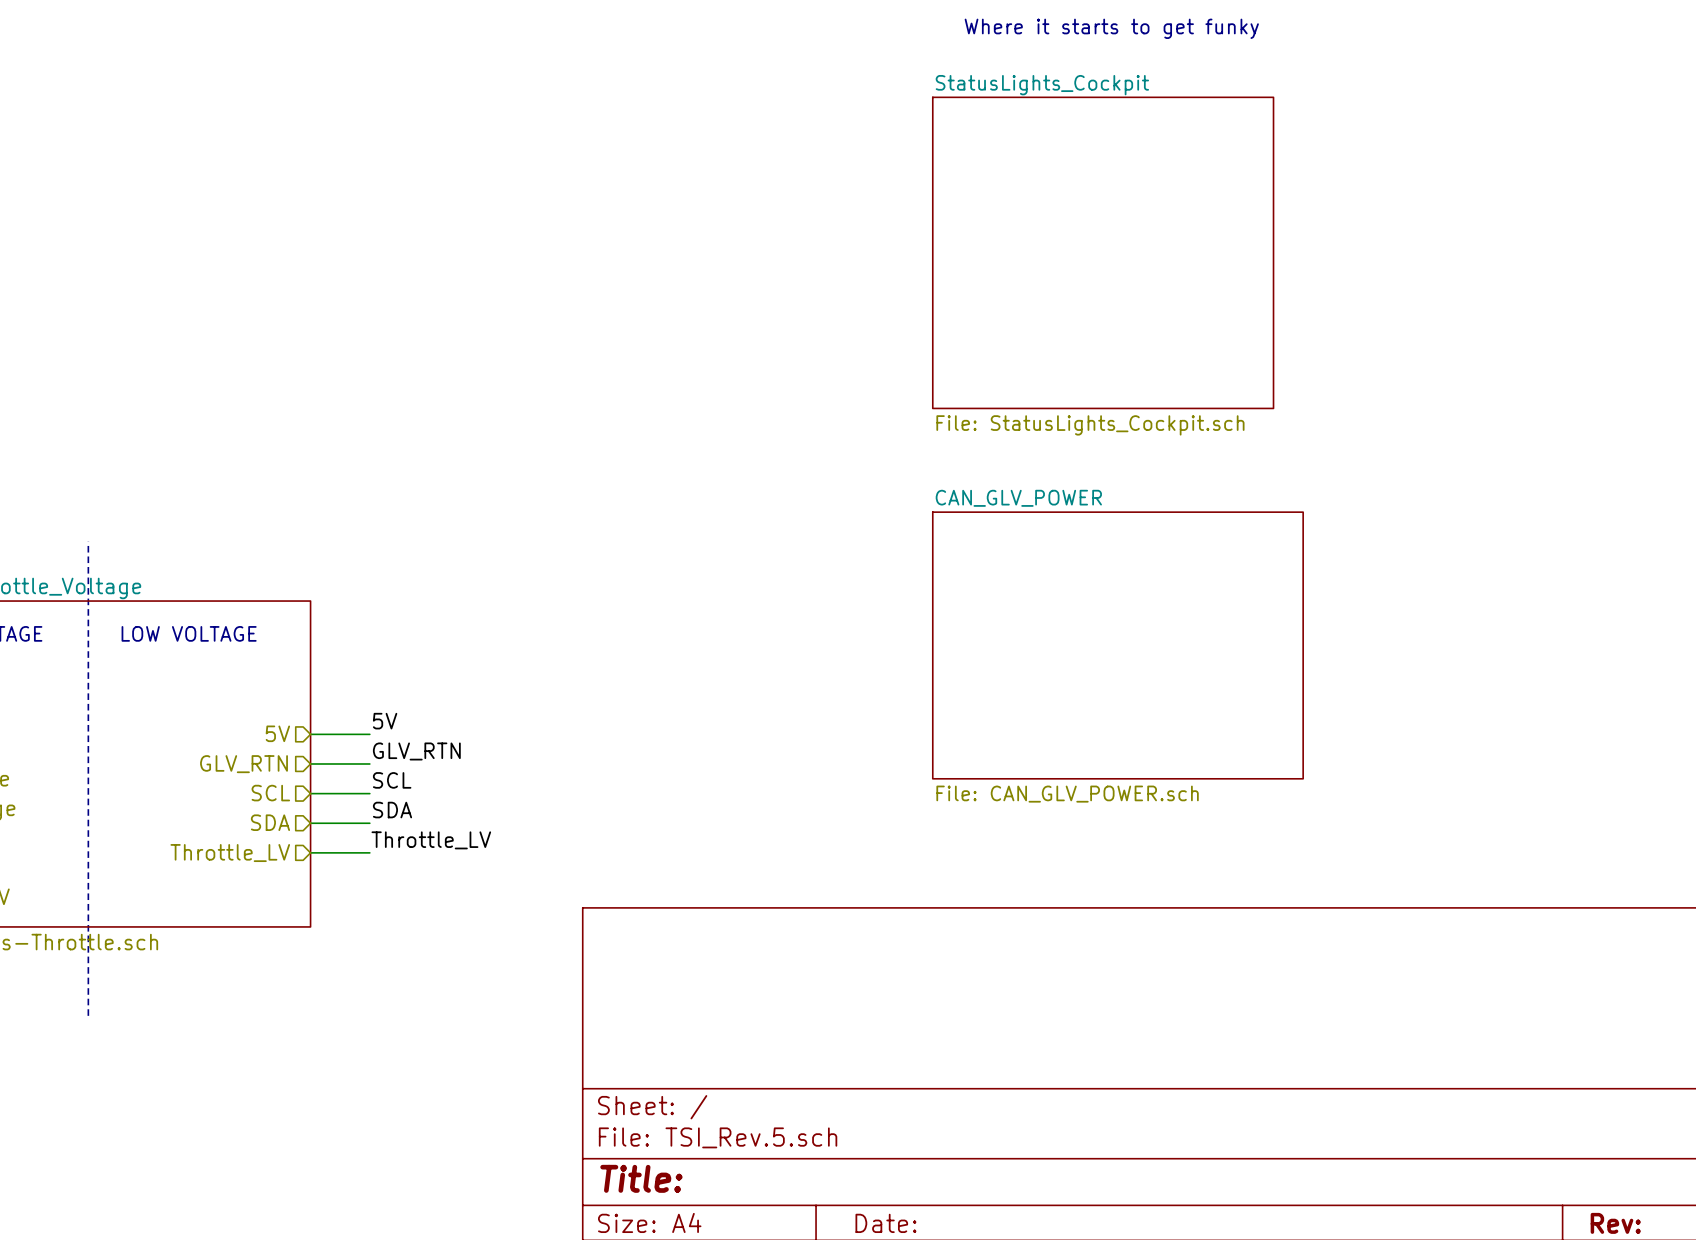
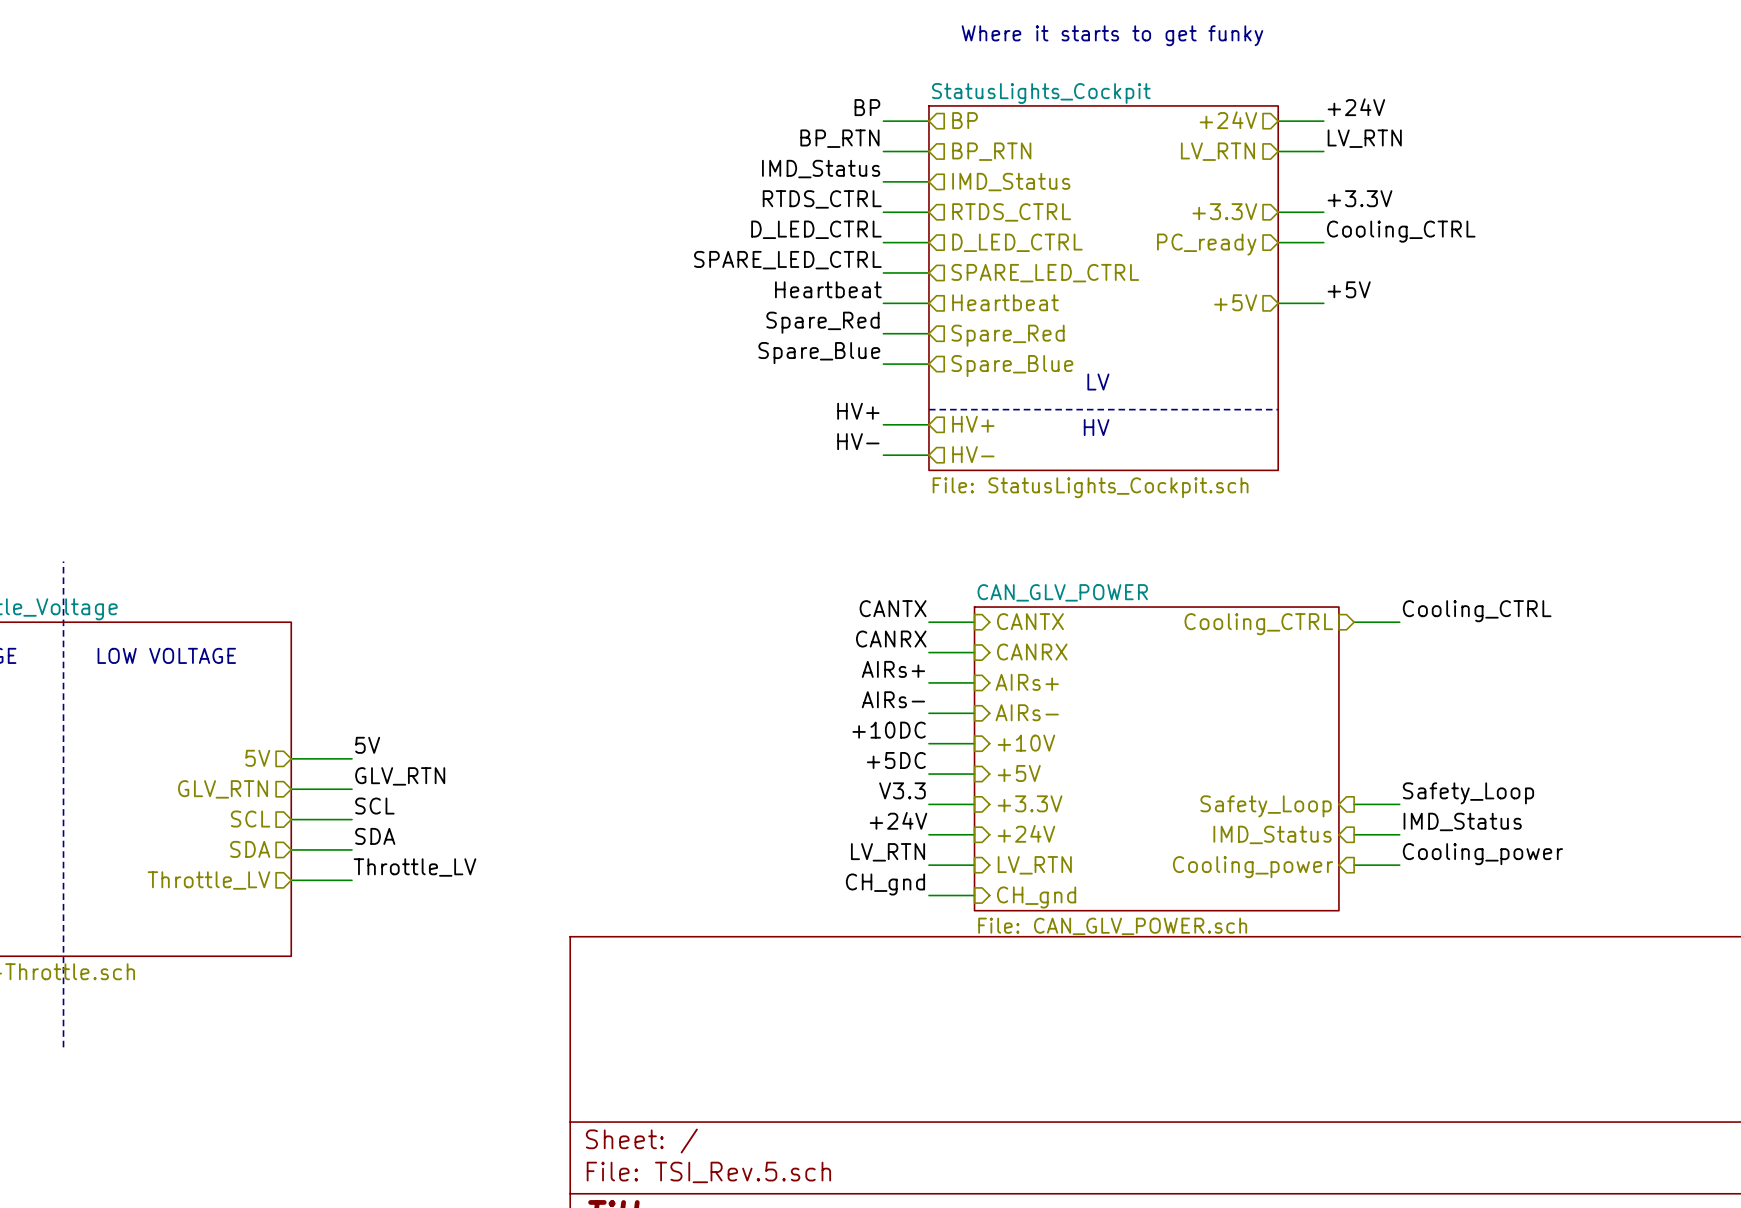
label: none -> BP (867, 107)
label: none -> +24V (1356, 107)
hierarchical label: none -> BP (965, 120)
hierarchical label: none -> +24V (1228, 120)
wire: none -> (883, 121) (928, 121)
wire: none -> (1278, 121) (1323, 121)
label: none -> BP_RTN (839, 138)
label: none -> LV_RTN (1364, 138)
wire: none -> (883, 151) (928, 151)
hierarchical label: none -> BP_RTN (991, 151)
hierarchical label: none -> LV_RTN (1217, 151)
wire: none -> (1278, 151) (1323, 151)
label: none -> IMD_Status (821, 169)
wire: none -> (883, 181) (928, 181)
hierarchical label: none -> IMD_Status (1011, 182)
label: none -> +3.3V (1360, 198)
label: none -> RTDS_CTRL (822, 199)
hierarchical label: none -> +3.3V (1224, 211)
wire: none -> (883, 212) (928, 212)
hierarchical label: none -> RTDS_CTRL (1011, 212)
wire: none -> (1278, 212) (1323, 212)
label: none -> D_LED_CTRL (816, 229)
label: none -> Cooling_CTRL (1401, 231)
wire: none -> (883, 242) (928, 242)
hierarchical label: none -> D_LED_CTRL (1017, 242)
wire: none -> (1278, 242) (1323, 242)
hierarchical label: none -> PC_ready (1206, 244)
label: none -> SPARE_LED_CTRL (787, 260)
sheet StatusLights_Cockpit: File: StatusLights_Cockpit.sch (1103, 252) -> none
wire: none -> (883, 272) (928, 272)
hierarchical label: none -> SPARE_LED_CTRL (1045, 273)
sheet StatusLights_Cockpit: none -> File: StatusLights_Cockpit.sch (1103, 288)
label: none -> Heartbeat (828, 289)
label: none -> +5V (1349, 289)
wire: none -> (883, 303) (928, 303)
hierarchical label: none -> Heartbeat (1005, 302)
hierarchical label: none -> +5V (1235, 302)
wire: none -> (1278, 303) (1323, 303)
label: none -> Spare_Red (822, 322)
wire: none -> (883, 333) (928, 333)
hierarchical label: none -> Spare_Red (1008, 335)
label: none -> Spare_Blue (819, 353)
wire: none -> (883, 364) (928, 364)
hierarchical label: none -> Spare_Blue (1012, 366)
text: none -> LV (1098, 382)
line: none -> (928, 409) (1278, 409)
label: none -> HV+ (858, 411)
hierarchical label: none -> HV+ (973, 424)
wire: none -> (883, 424) (928, 424)
text: none -> HV (1096, 427)
label: none -> HV- (858, 441)
hierarchical label: none -> HV- (973, 454)
wire: none -> (883, 455) (928, 455)
label: none -> CANTX (893, 608)
label: none -> Cooling_CTRL (1477, 611)
hierarchical label: none -> CANTX (1030, 621)
wire: none -> (928, 622) (974, 622)
wire: none -> (1354, 622) (1399, 622)
hierarchical label: none -> Cooling_CTRL (1258, 624)
label: none -> CANRX (891, 639)
wire: none -> (928, 652) (974, 652)
hierarchical label: none -> CANRX (1032, 652)
sheet CAN_GLV_POWER: File: CAN_GLV_POWER.sch (1117, 645) -> none
label: none -> AIRs+ (893, 669)
hierarchical label: none -> AIRs+ (1027, 682)
wire: none -> (928, 682) (974, 682)
label: none -> AIRs- (893, 699)
wire: none -> (928, 713) (974, 713)
hierarchical label: none -> AIRs- (1027, 712)
label: none -> +10DC (889, 730)
hierarchical label: none -> +10V (1026, 743)
wire: none -> (928, 743) (974, 743)
sheet CAN_GLV_POWER: none -> File: CAN_GLV_POWER.sch (1156, 758)
label: none -> +5DC (896, 760)
hierarchical label: none -> +5V (1019, 773)
wire: none -> (928, 774) (974, 774)
label: none -> V3.3 (902, 790)
label: none -> Safety_Loop (1468, 793)
hierarchical label: none -> +3.3V (1030, 803)
wire: none -> (1354, 804) (1399, 804)
hierarchical label: none -> Safety_Loop (1266, 806)
label: none -> +24V (898, 820)
label: none -> IMD_Status (1462, 821)
hierarchical label: none -> +24V (1026, 833)
wire: none -> (928, 834) (974, 834)
hierarchical label: none -> IMD_Status (1272, 834)
wire: none -> (1354, 834) (1399, 834)
label: none -> LV_RTN (888, 852)
label: none -> Cooling_power (1482, 854)
wire: none -> (928, 865) (974, 865)
hierarchical label: none -> LV_RTN (1034, 865)
wire: none -> (1354, 865) (1399, 865)
hierarchical label: none -> Cooling_power (1253, 867)
label: none -> CH_gnd (885, 884)
wire: none -> (928, 895) (974, 895)
hierarchical label: none -> CH_gnd (1036, 897)

